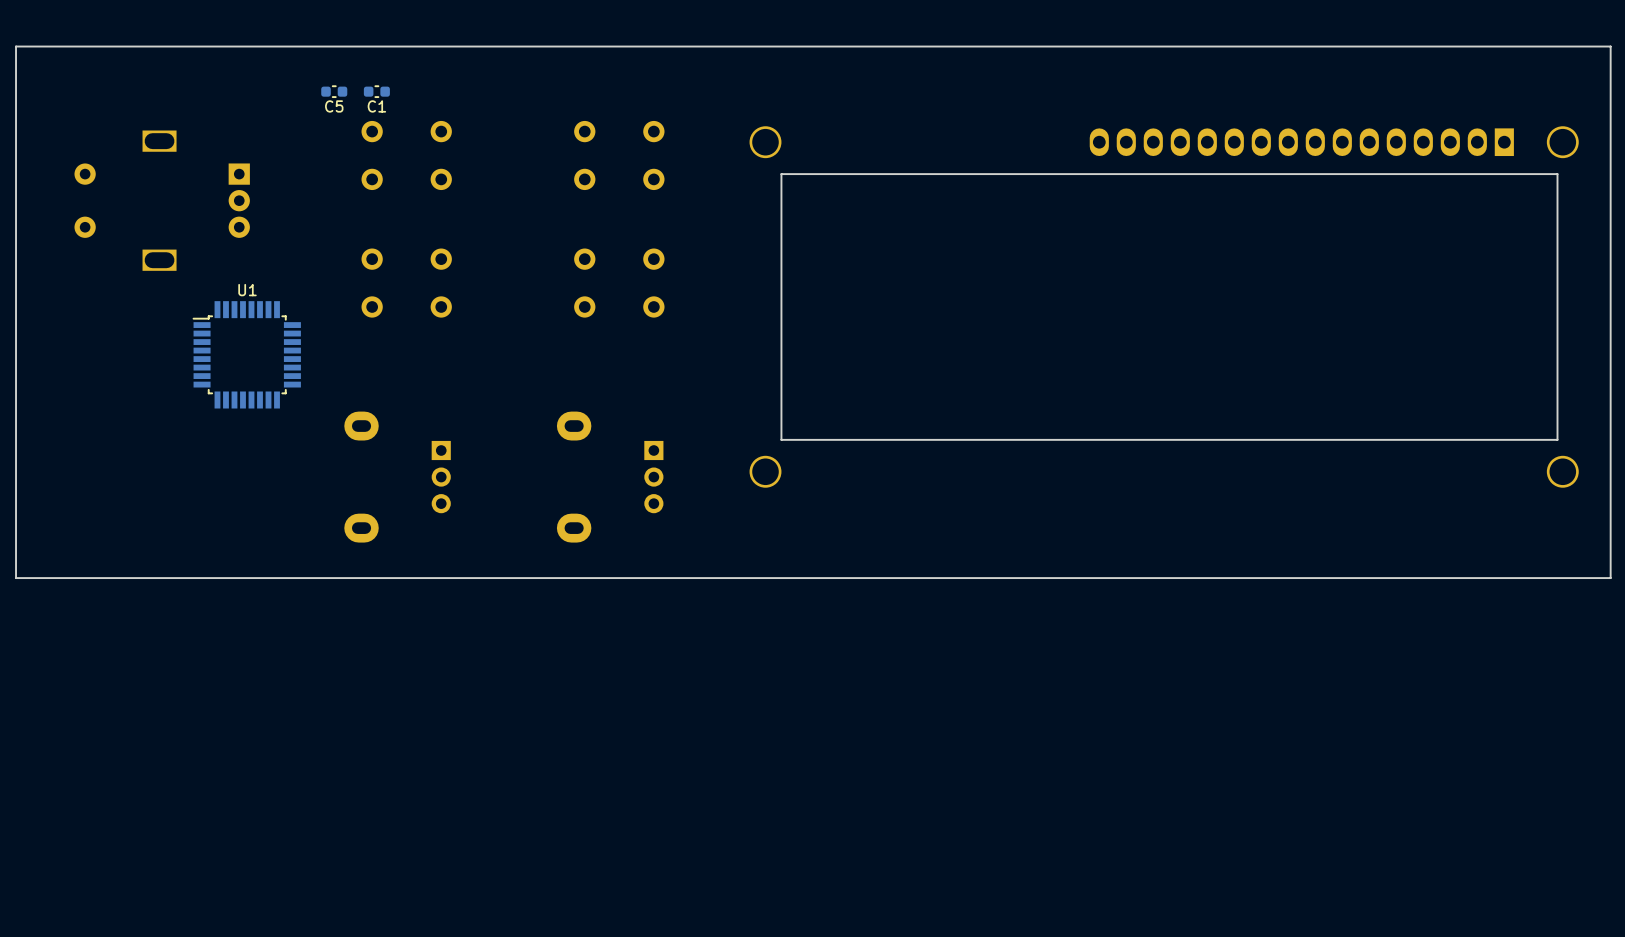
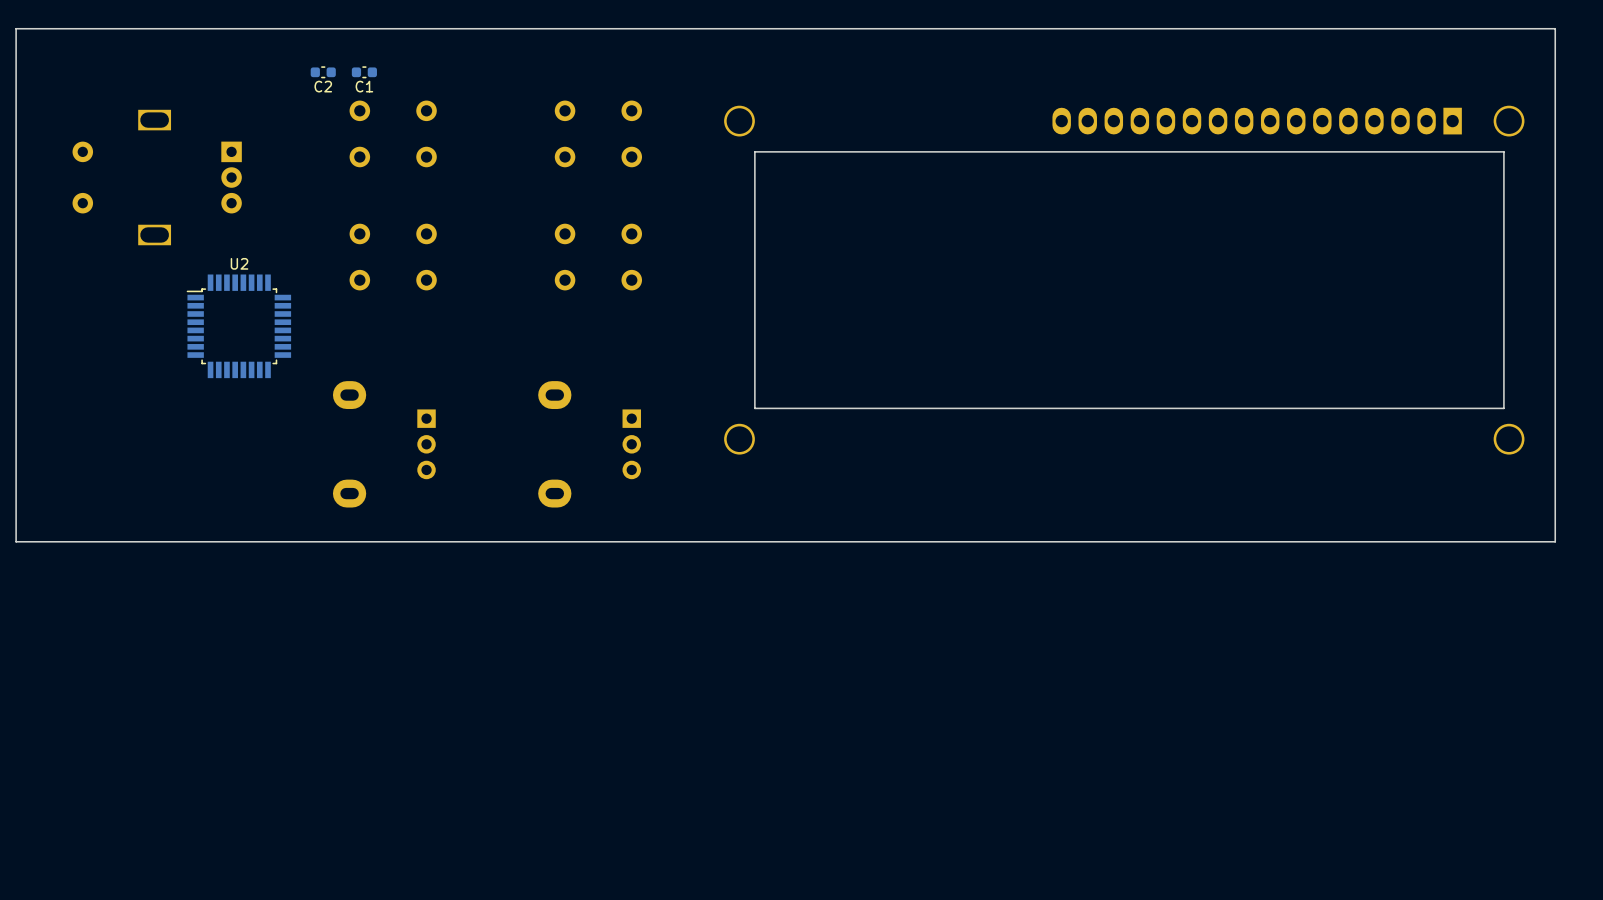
C5 name: C5 (334, 106) -> C2 (323, 86)
U1 name: U1 (247, 290) -> U2 (239, 263)

